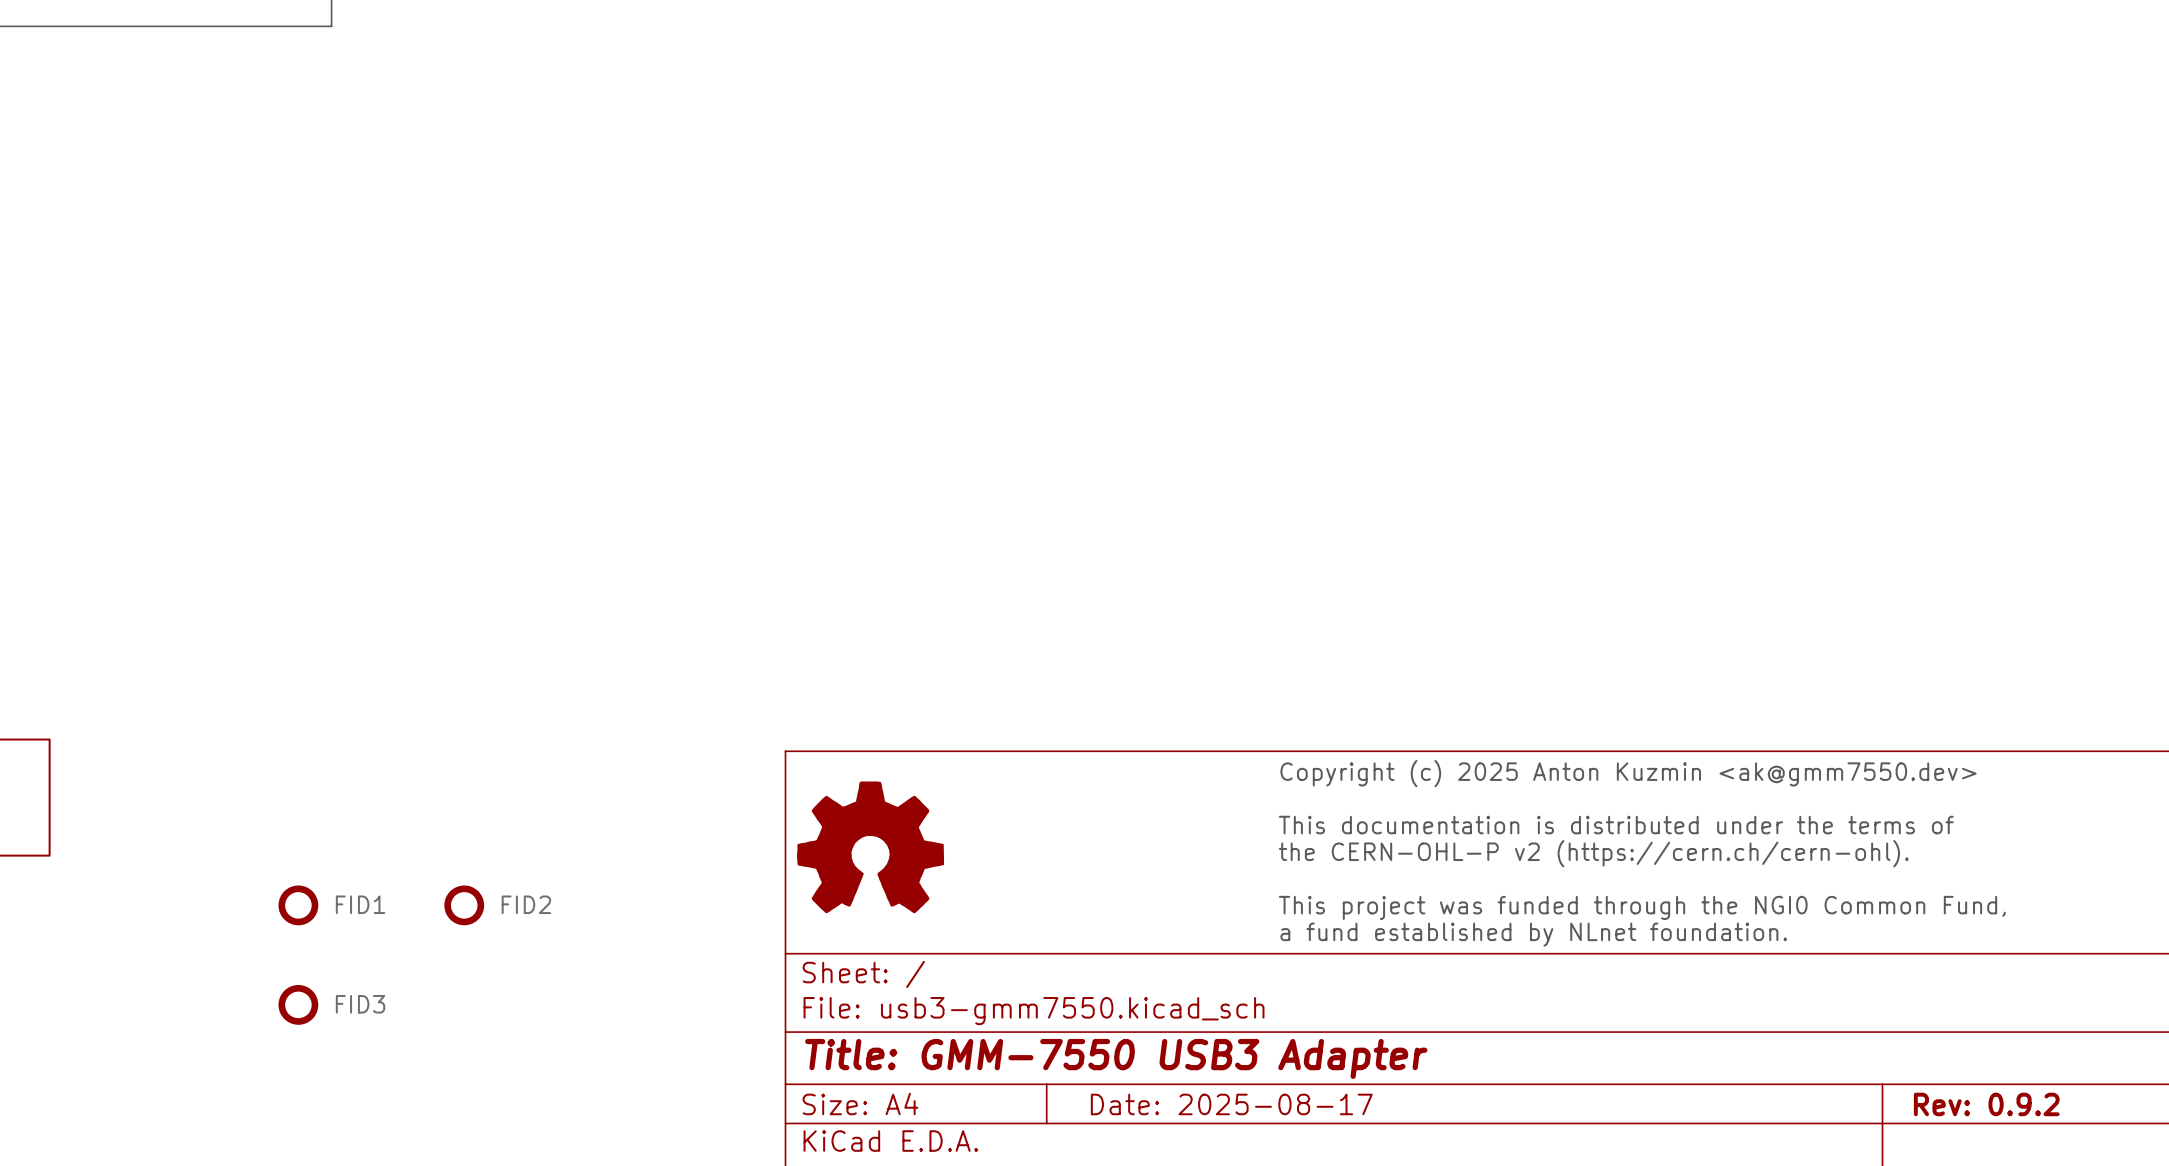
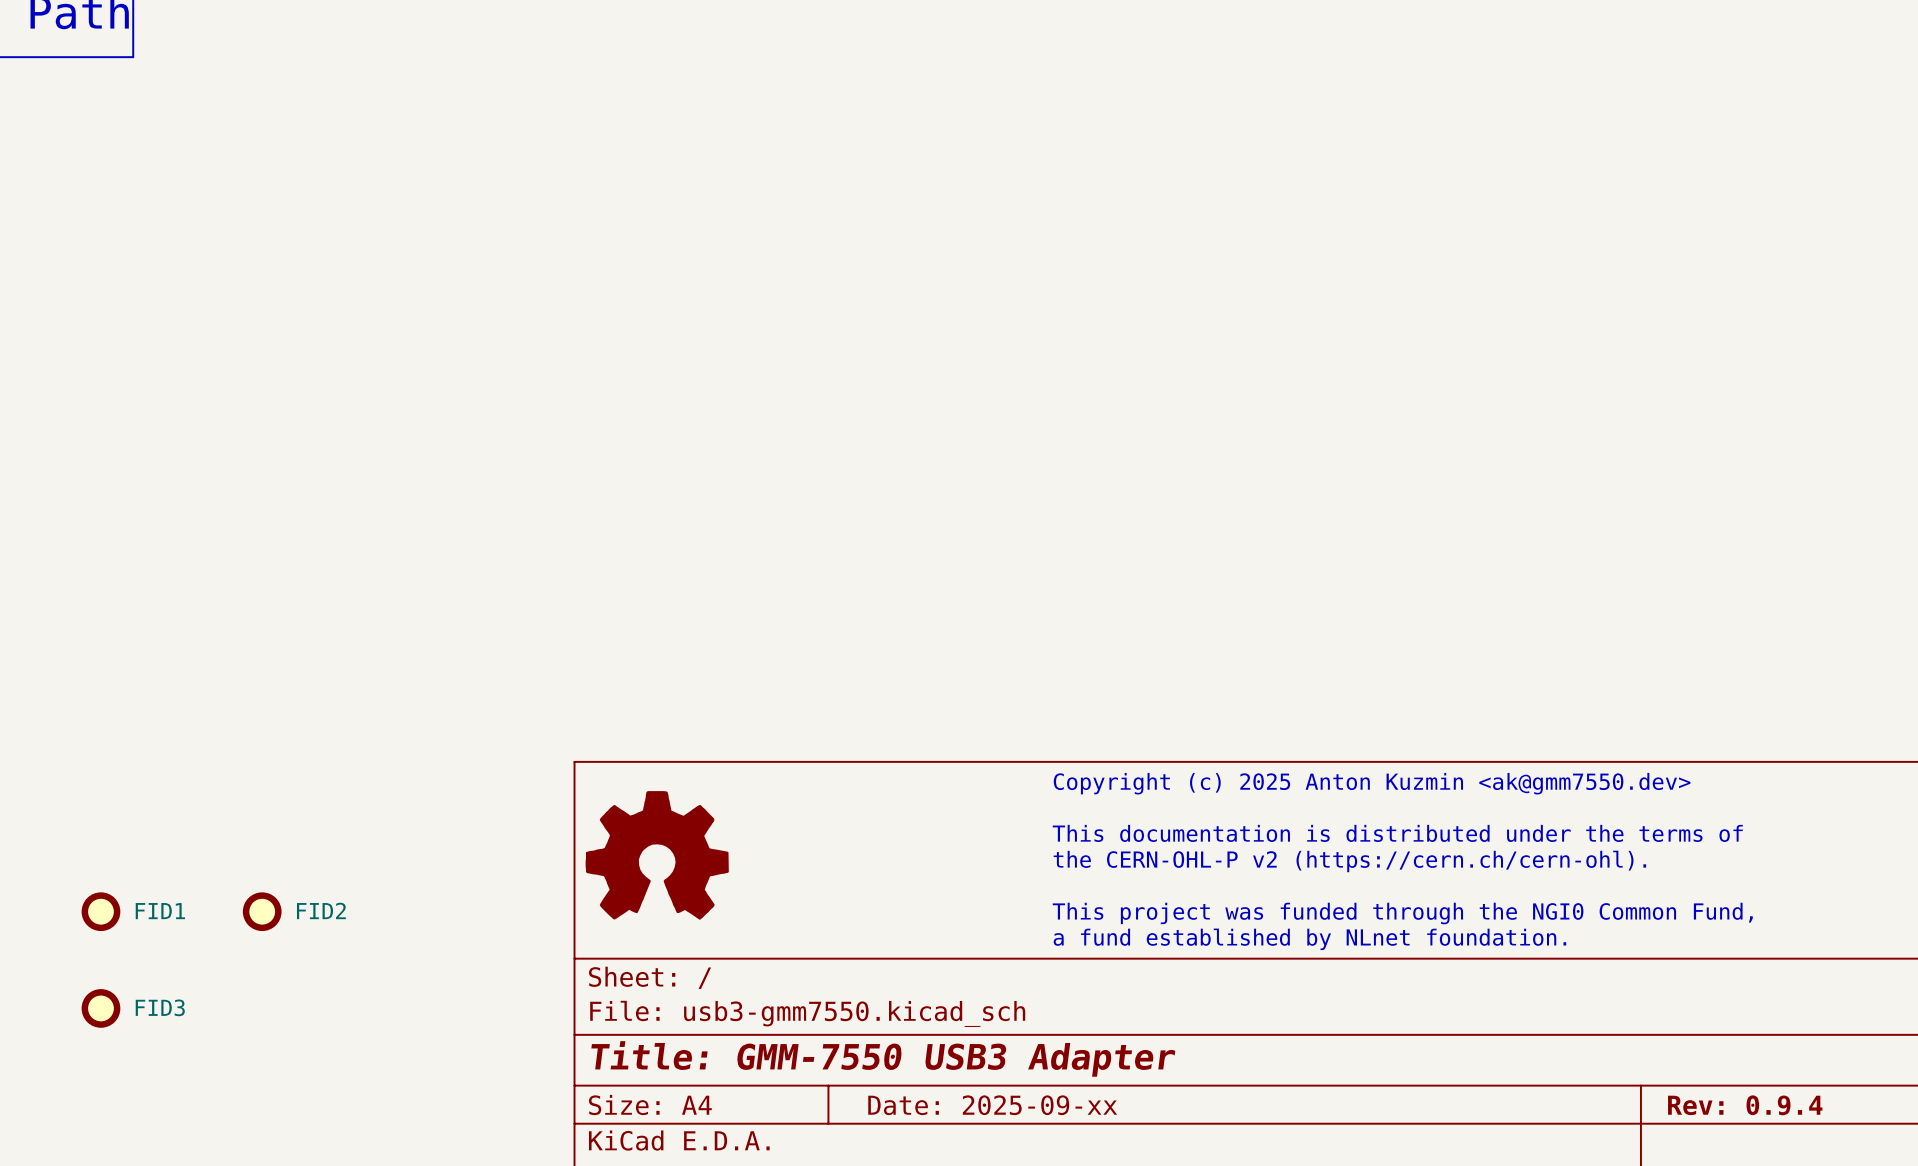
title block: Date: 2025-08-17 (1231, 1104) -> Date: 2025-09-xx (992, 1105)
title block: Rev: 0.9.2 (1986, 1104) -> Rev: 0.9.4 (1745, 1105)

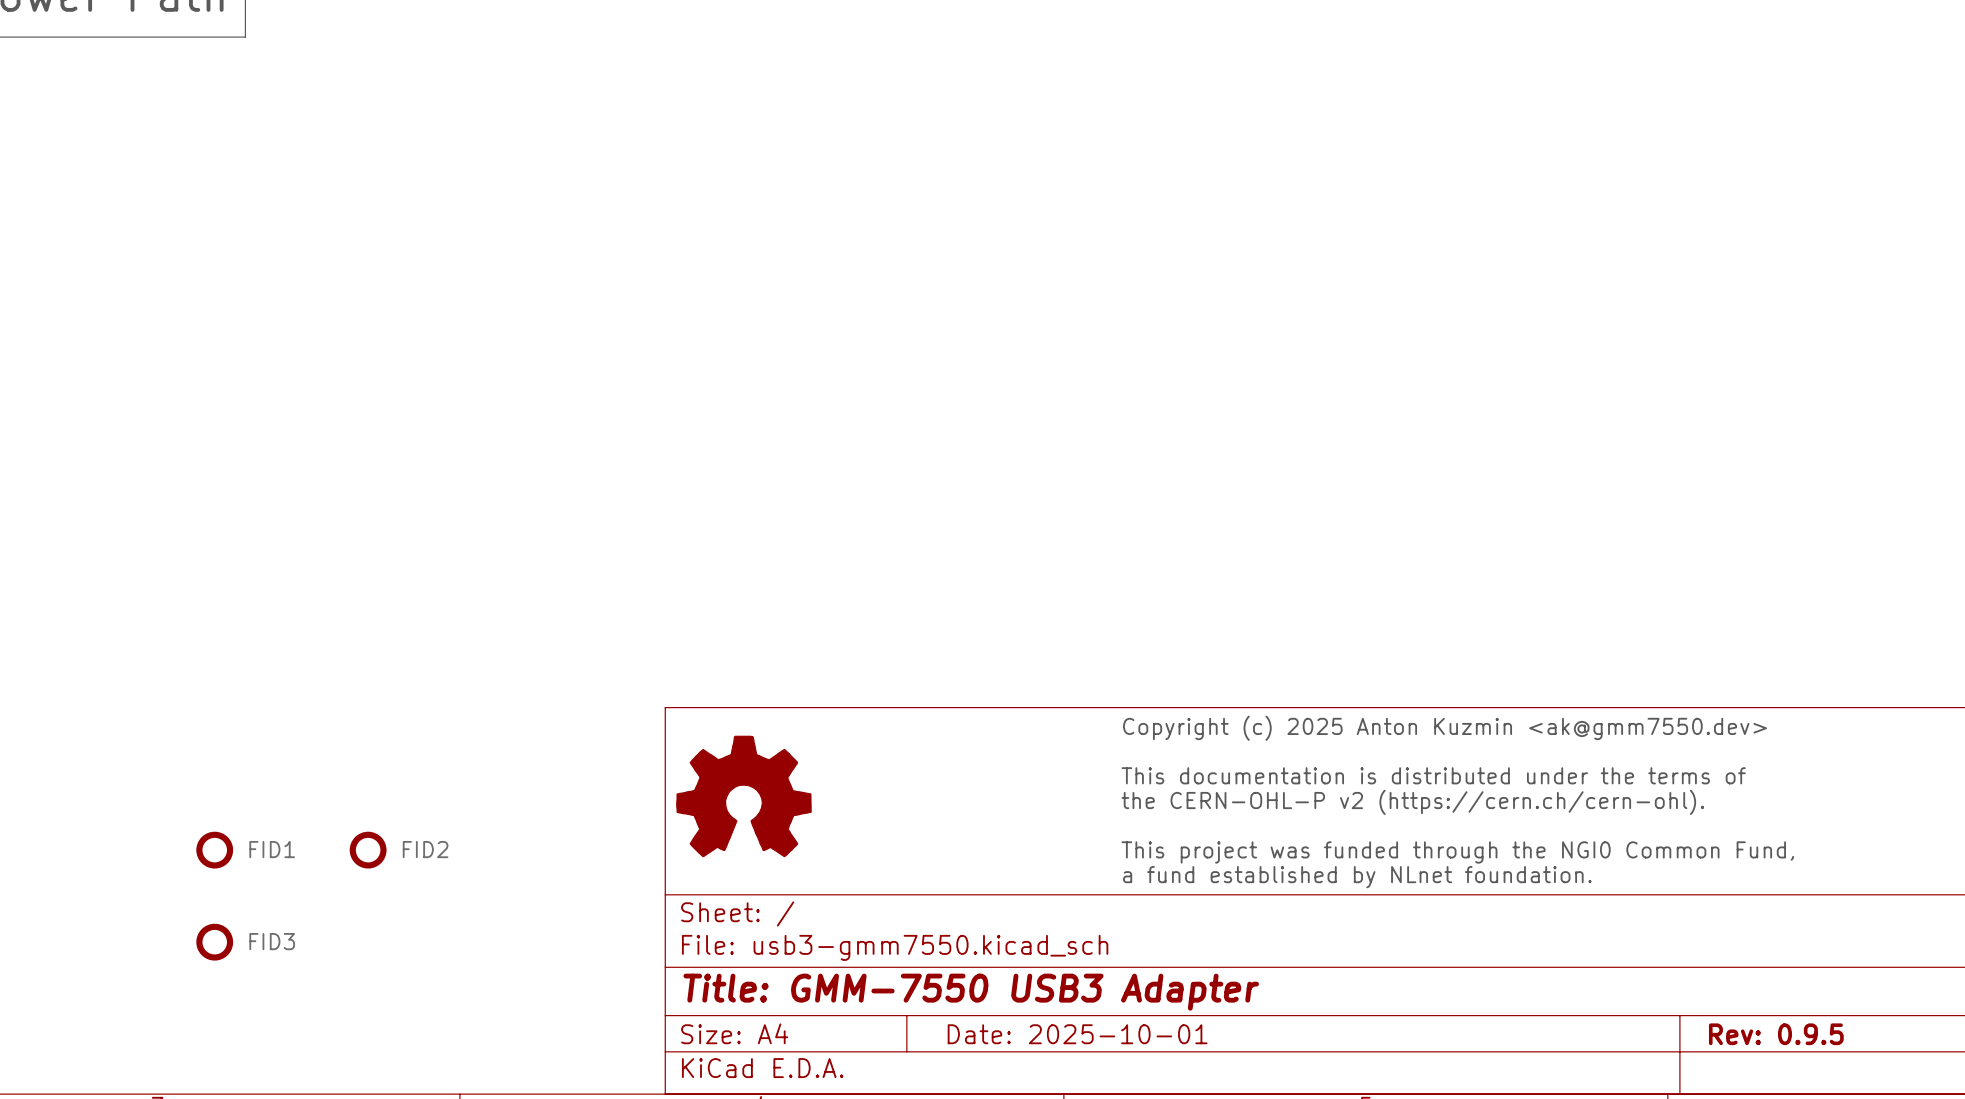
title block: Date: 2025-09-xx (992, 1105) -> Date: 2025-10-01 (1077, 1034)
title block: Rev: 0.9.4 (1745, 1105) -> Rev: 0.9.5 (1776, 1034)

